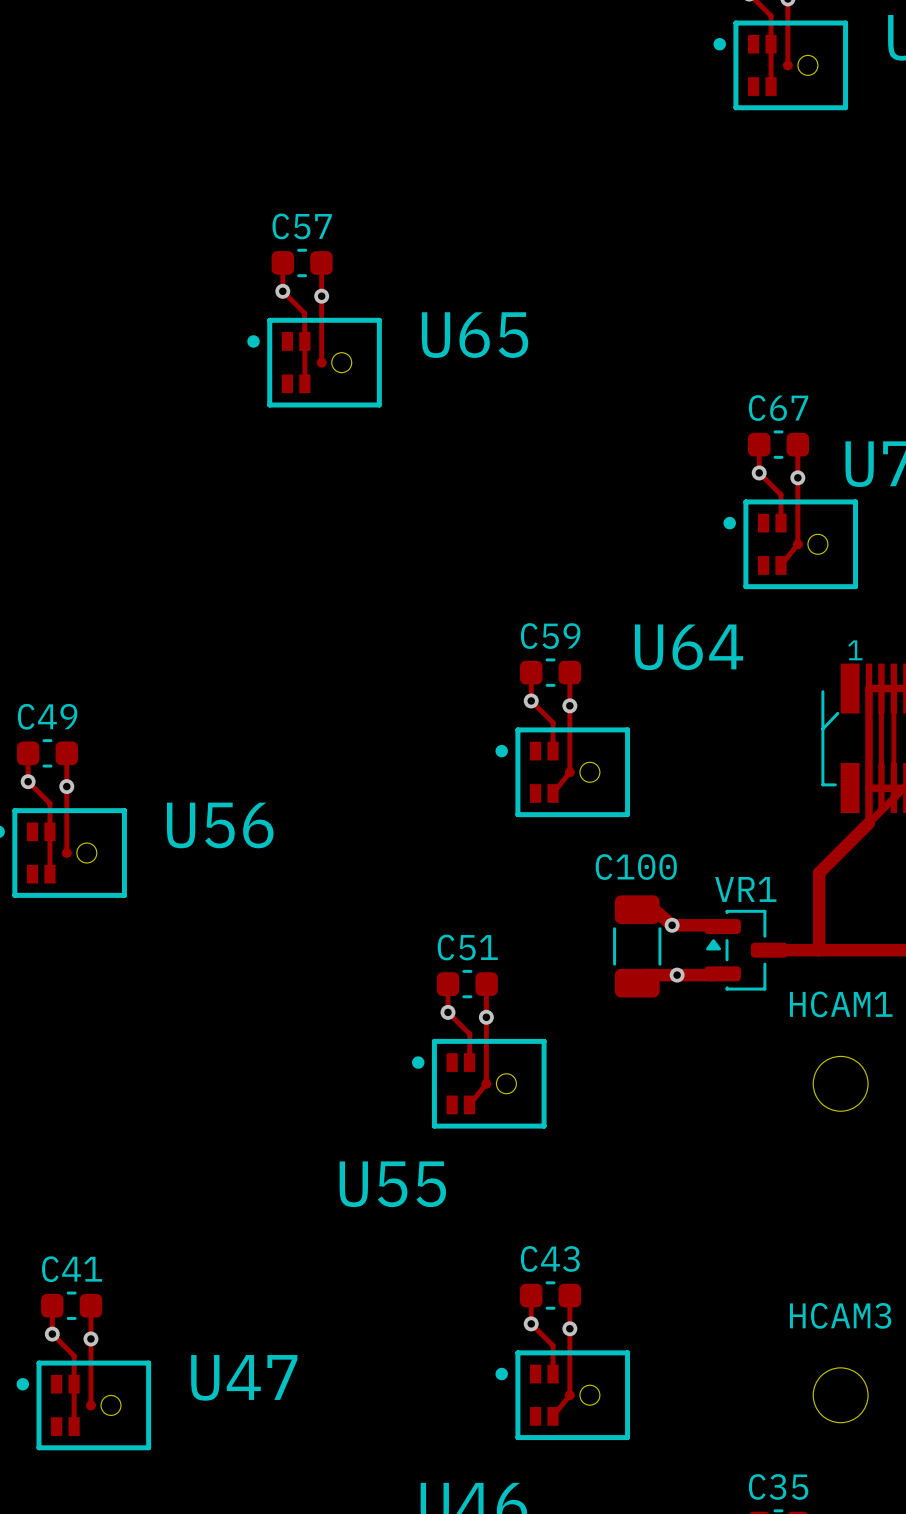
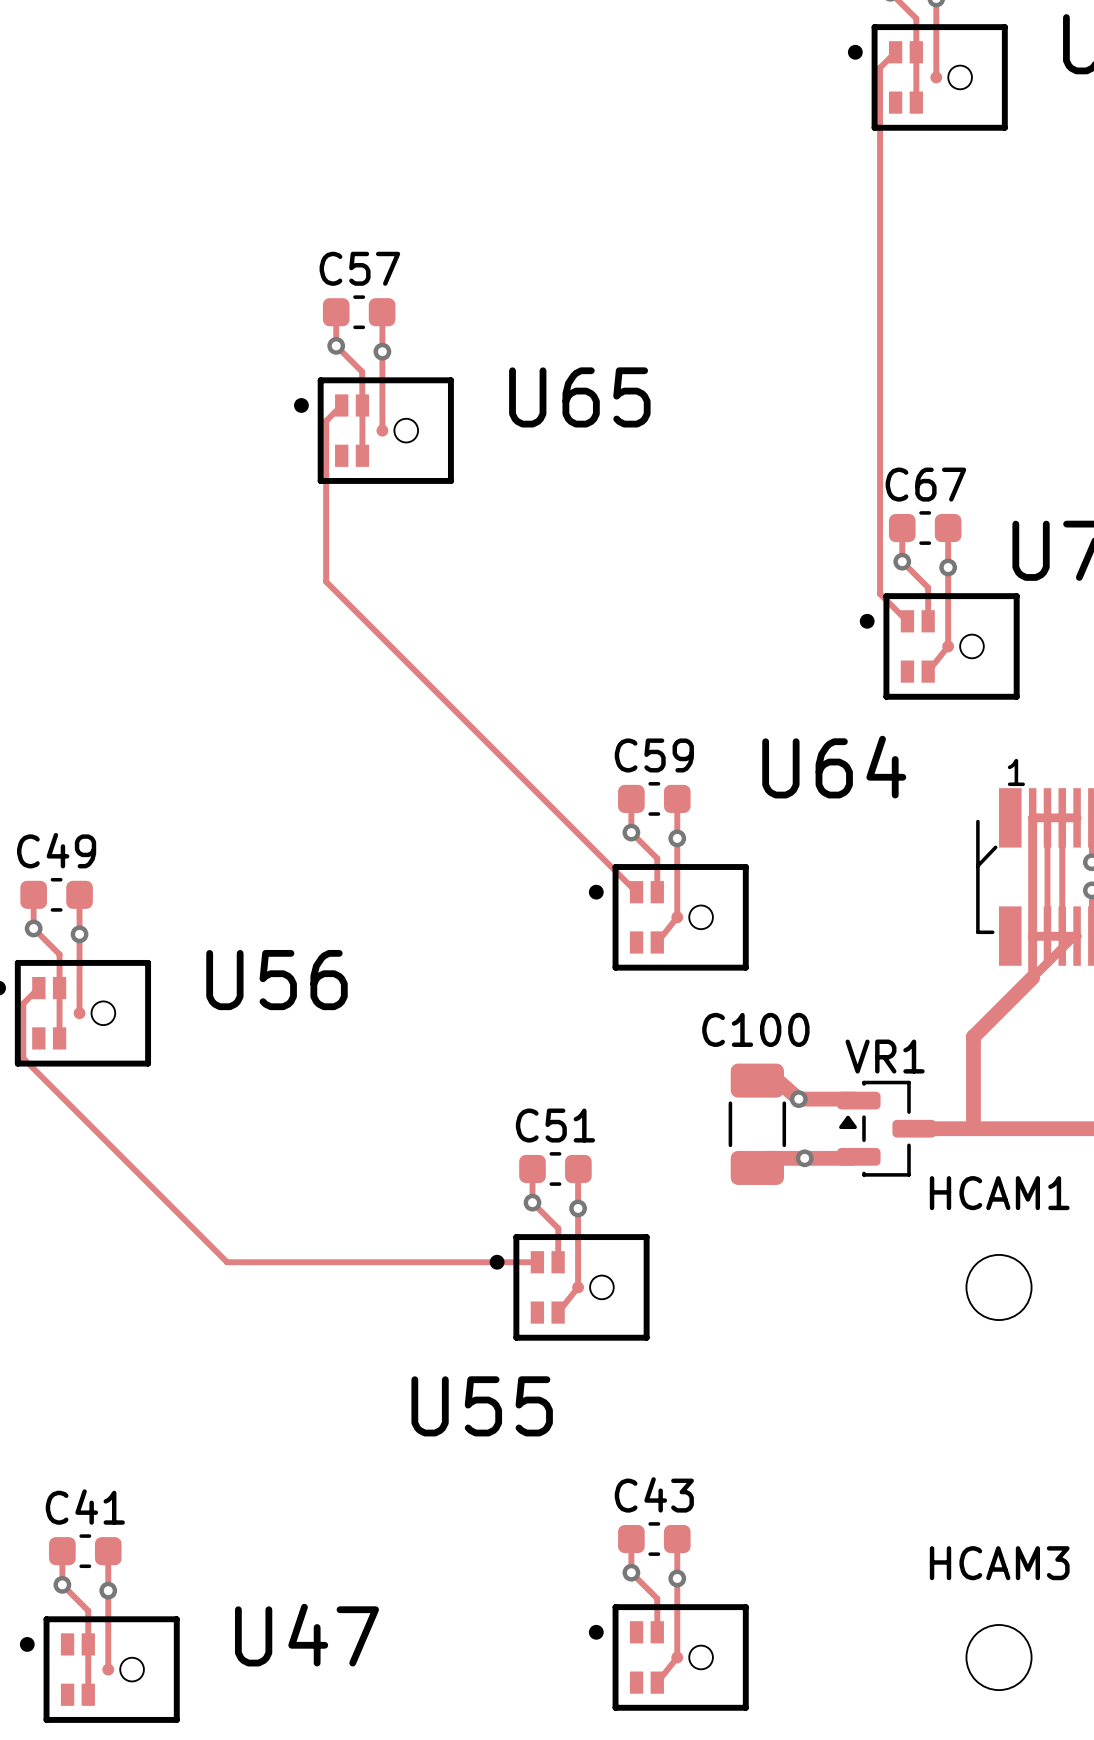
top track: none -> (895, 52) (880, 67) (880, 593) (907, 621)
top track: none -> (341, 405) (326, 421) (326, 581) (636, 892)
top track: none -> (38, 988) (23, 1003) (23, 1058) (227, 1262) (537, 1262)

